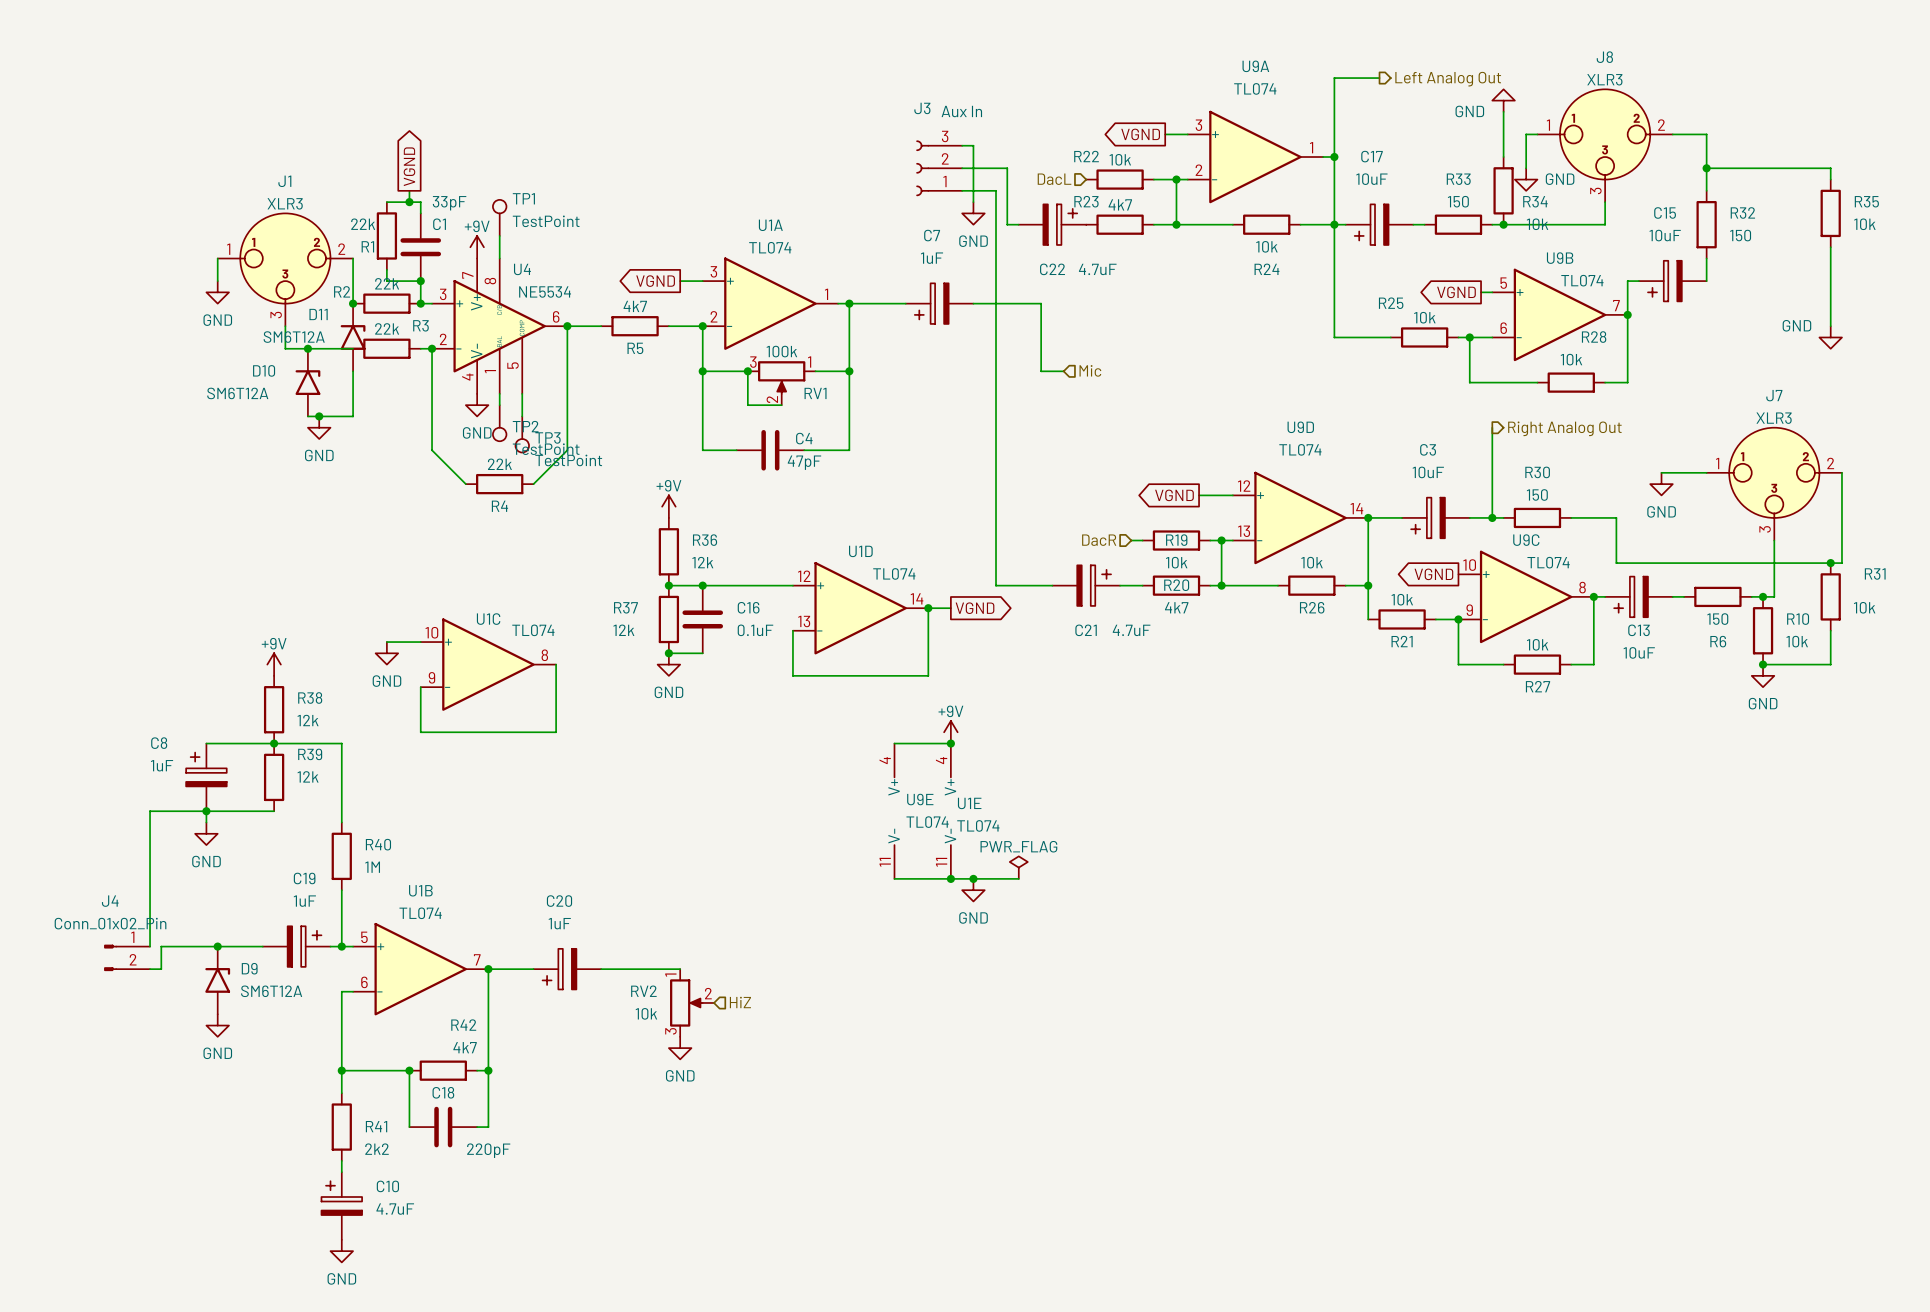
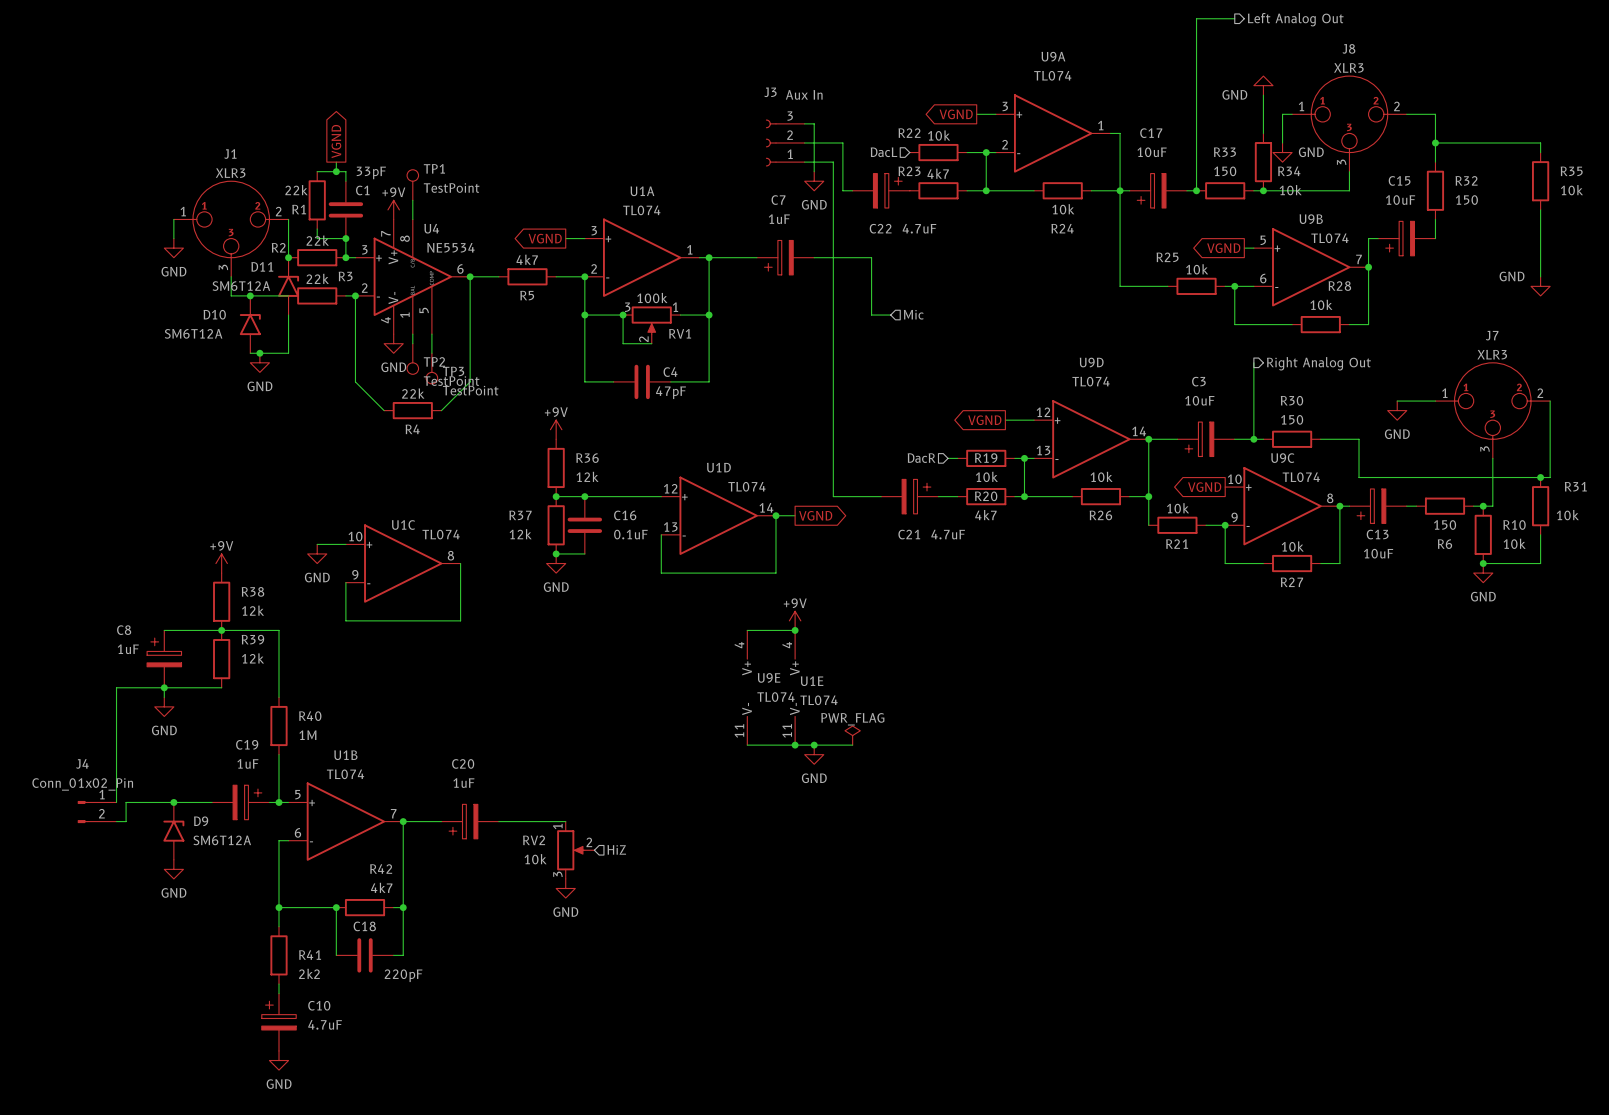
wire: none -> (1234, 18) (1196, 18) (1196, 190)
wire: (1379, 78) (1334, 78) (1334, 157) -> none
hierarchical label position: Left Analog Out (1448, 79) -> Left Analog Out (1295, 19)
junction: (1334, 157) -> none
junction: none -> (1196, 190)

